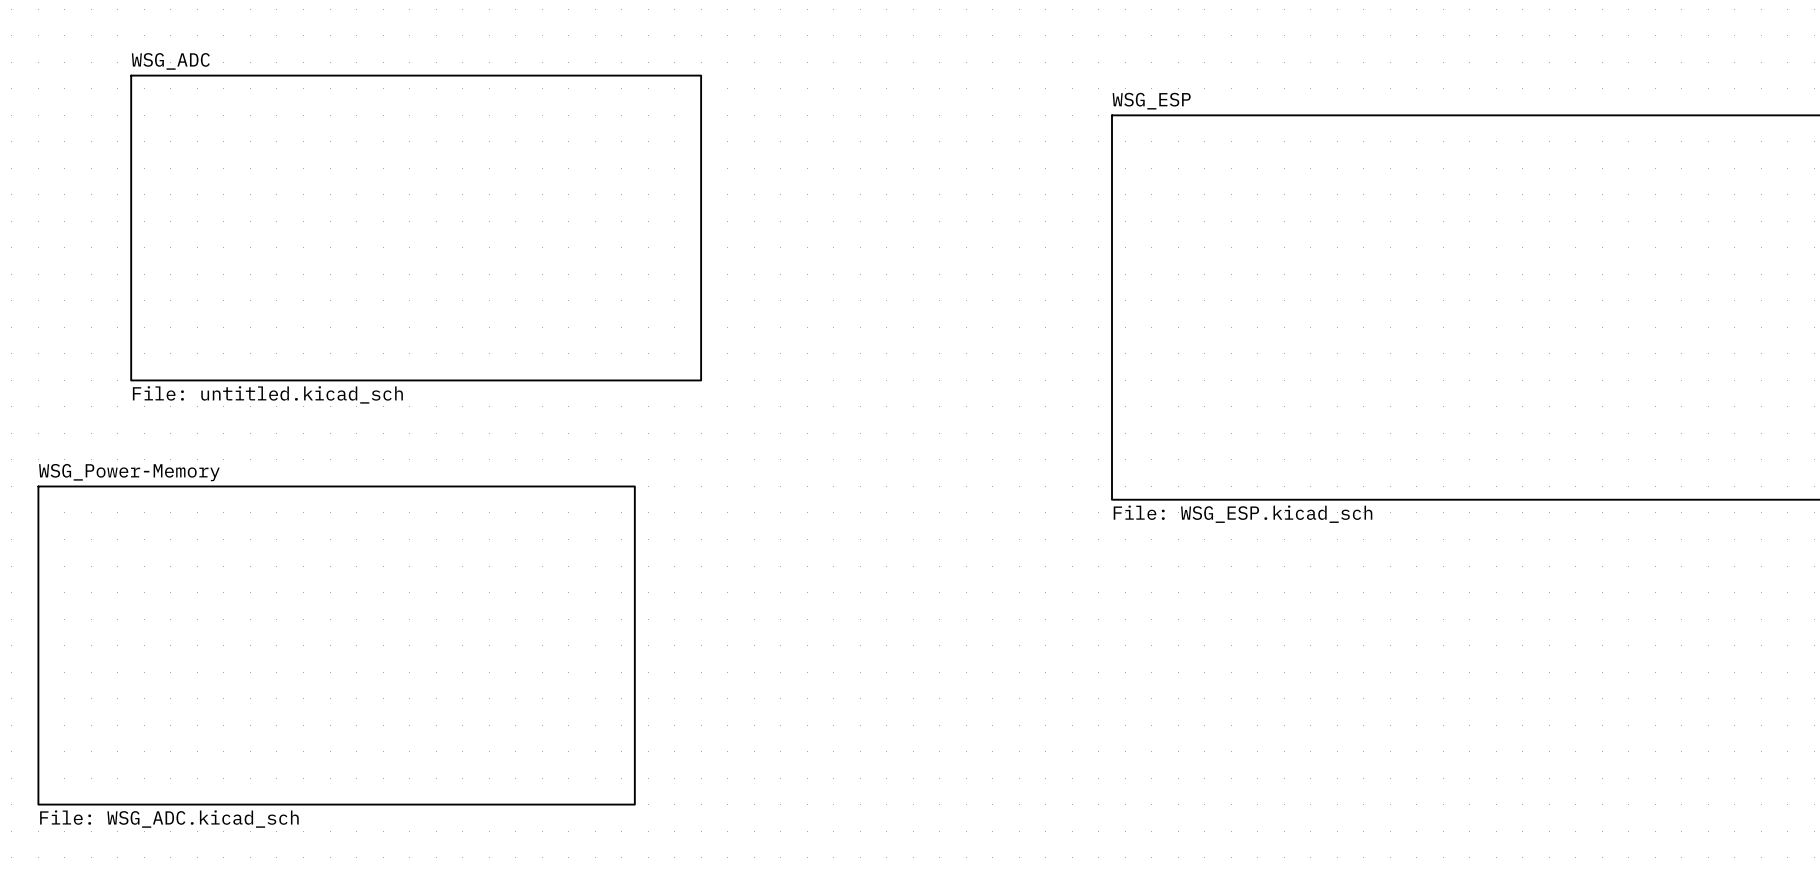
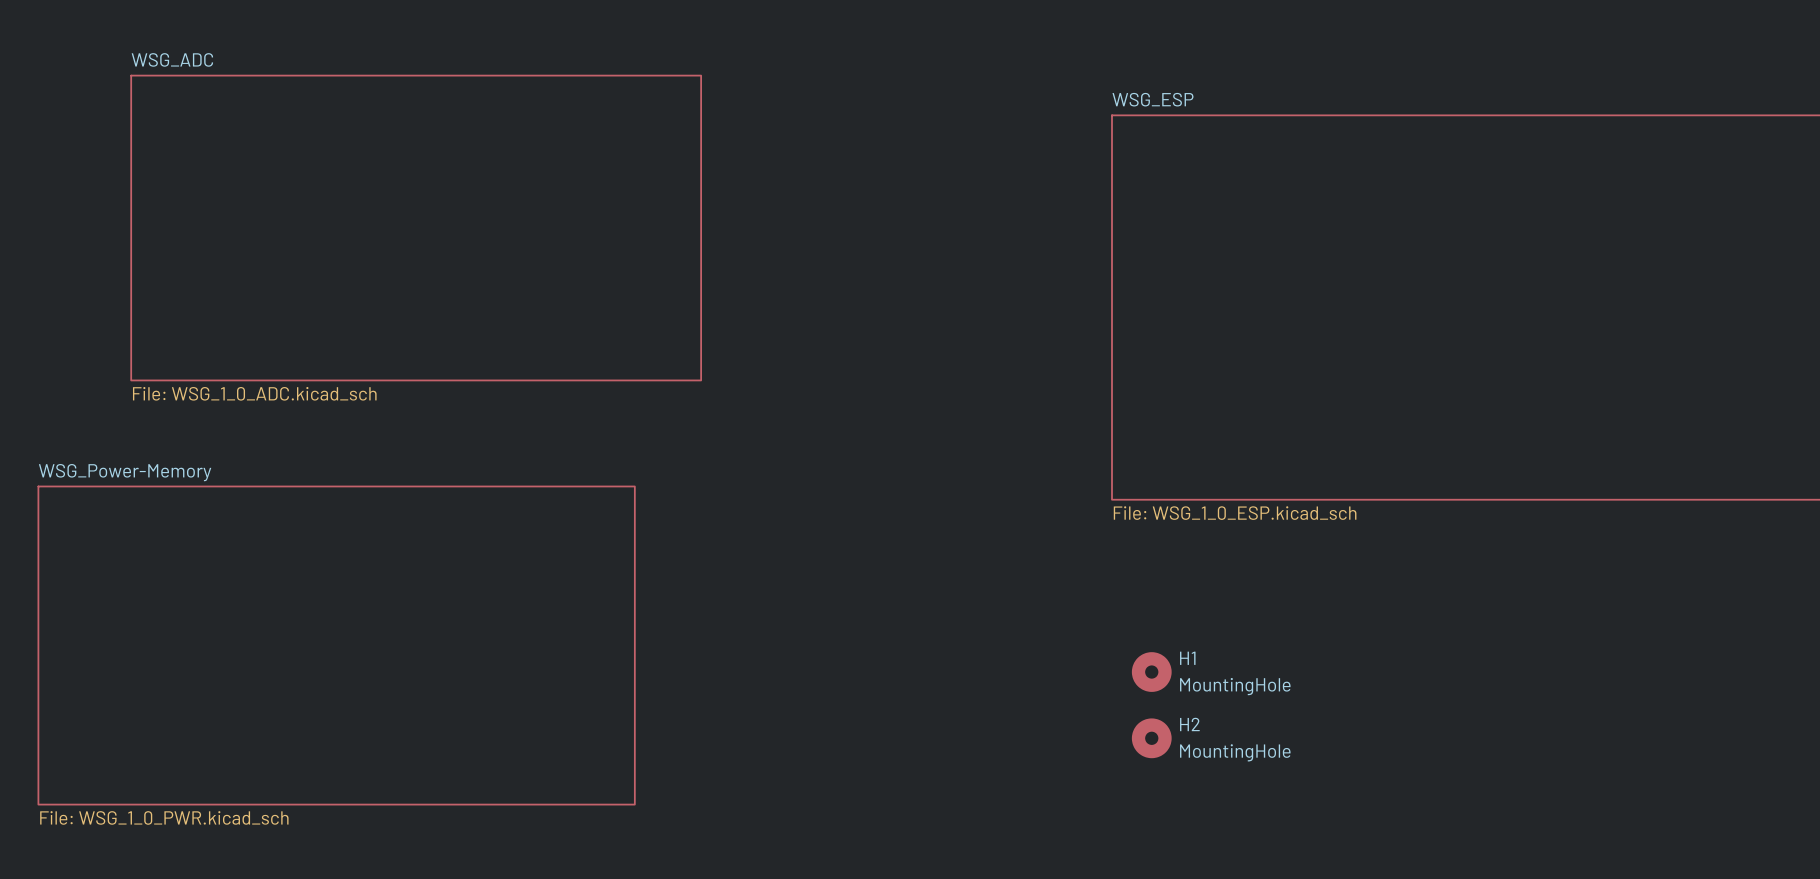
sheet WSG_ADC value: File: untitled.kicad_sch (267, 394) -> File: WSG_1_0_ADC.kicad_sch (254, 393)
sheet WSG_ESP value: File: WSG_ESP.kicad_sch (1243, 514) -> File: WSG_1_0_ESP.kicad_sch (1235, 513)
H1: none -> MountingHole (1151, 672)
H2: none -> MountingHole (1151, 738)
sheet WSG_Power-Memory value: File: WSG_ADC.kicad_sch (169, 819) -> File: WSG_1_0_PWR.kicad_sch (164, 817)

